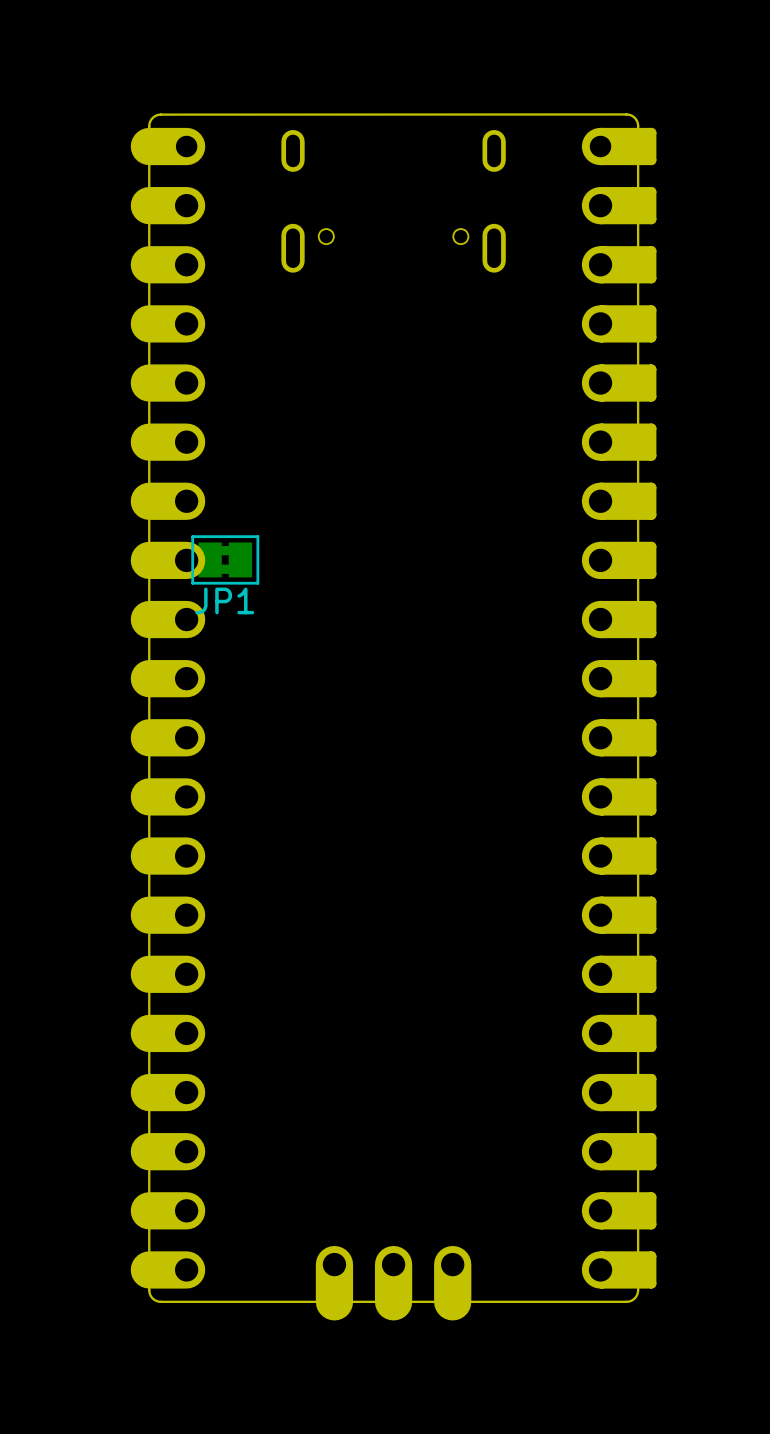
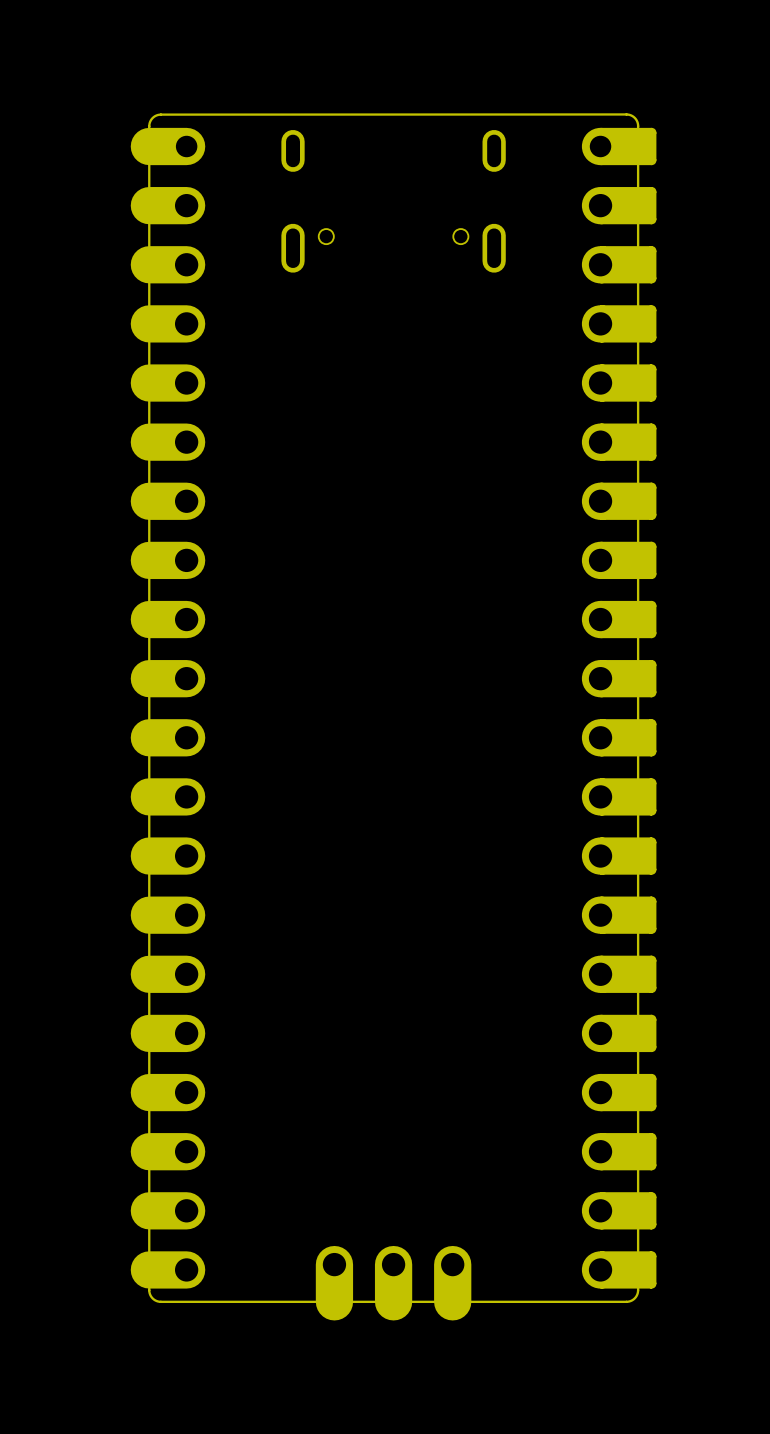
JP1: (225, 559) -> none

